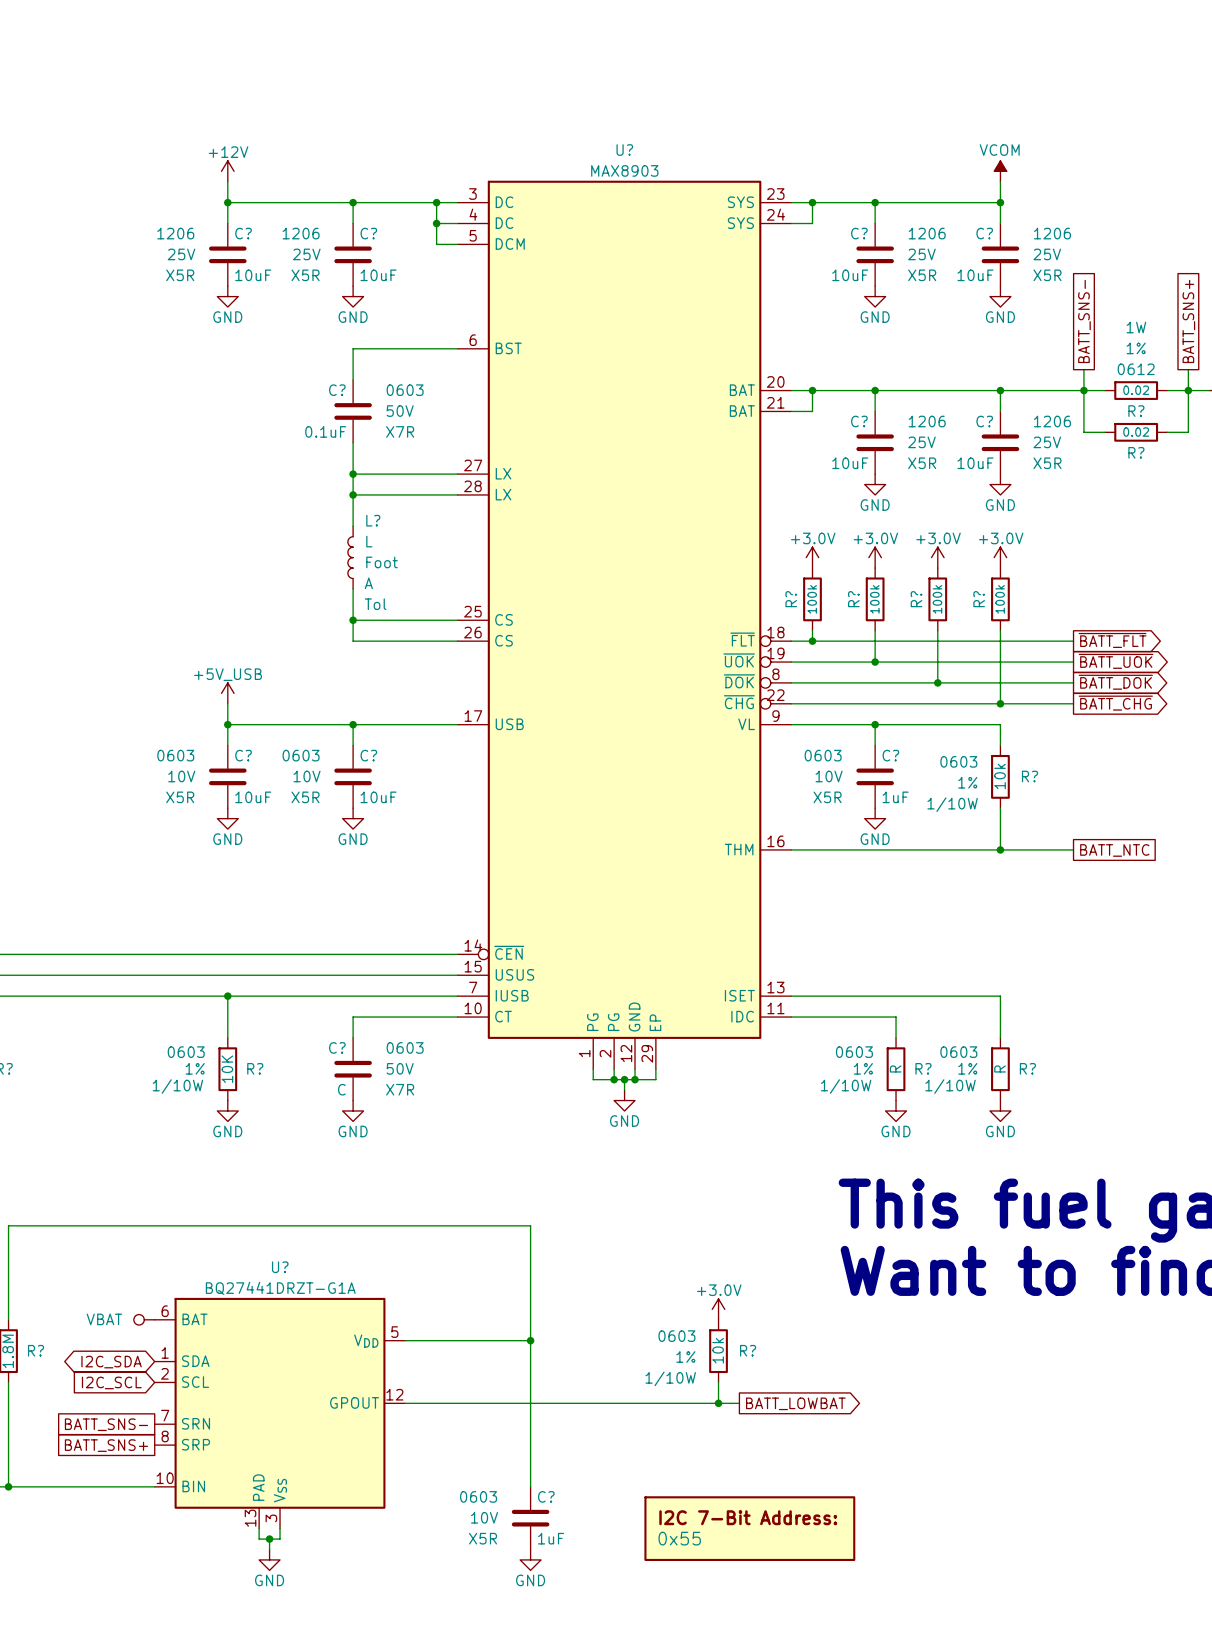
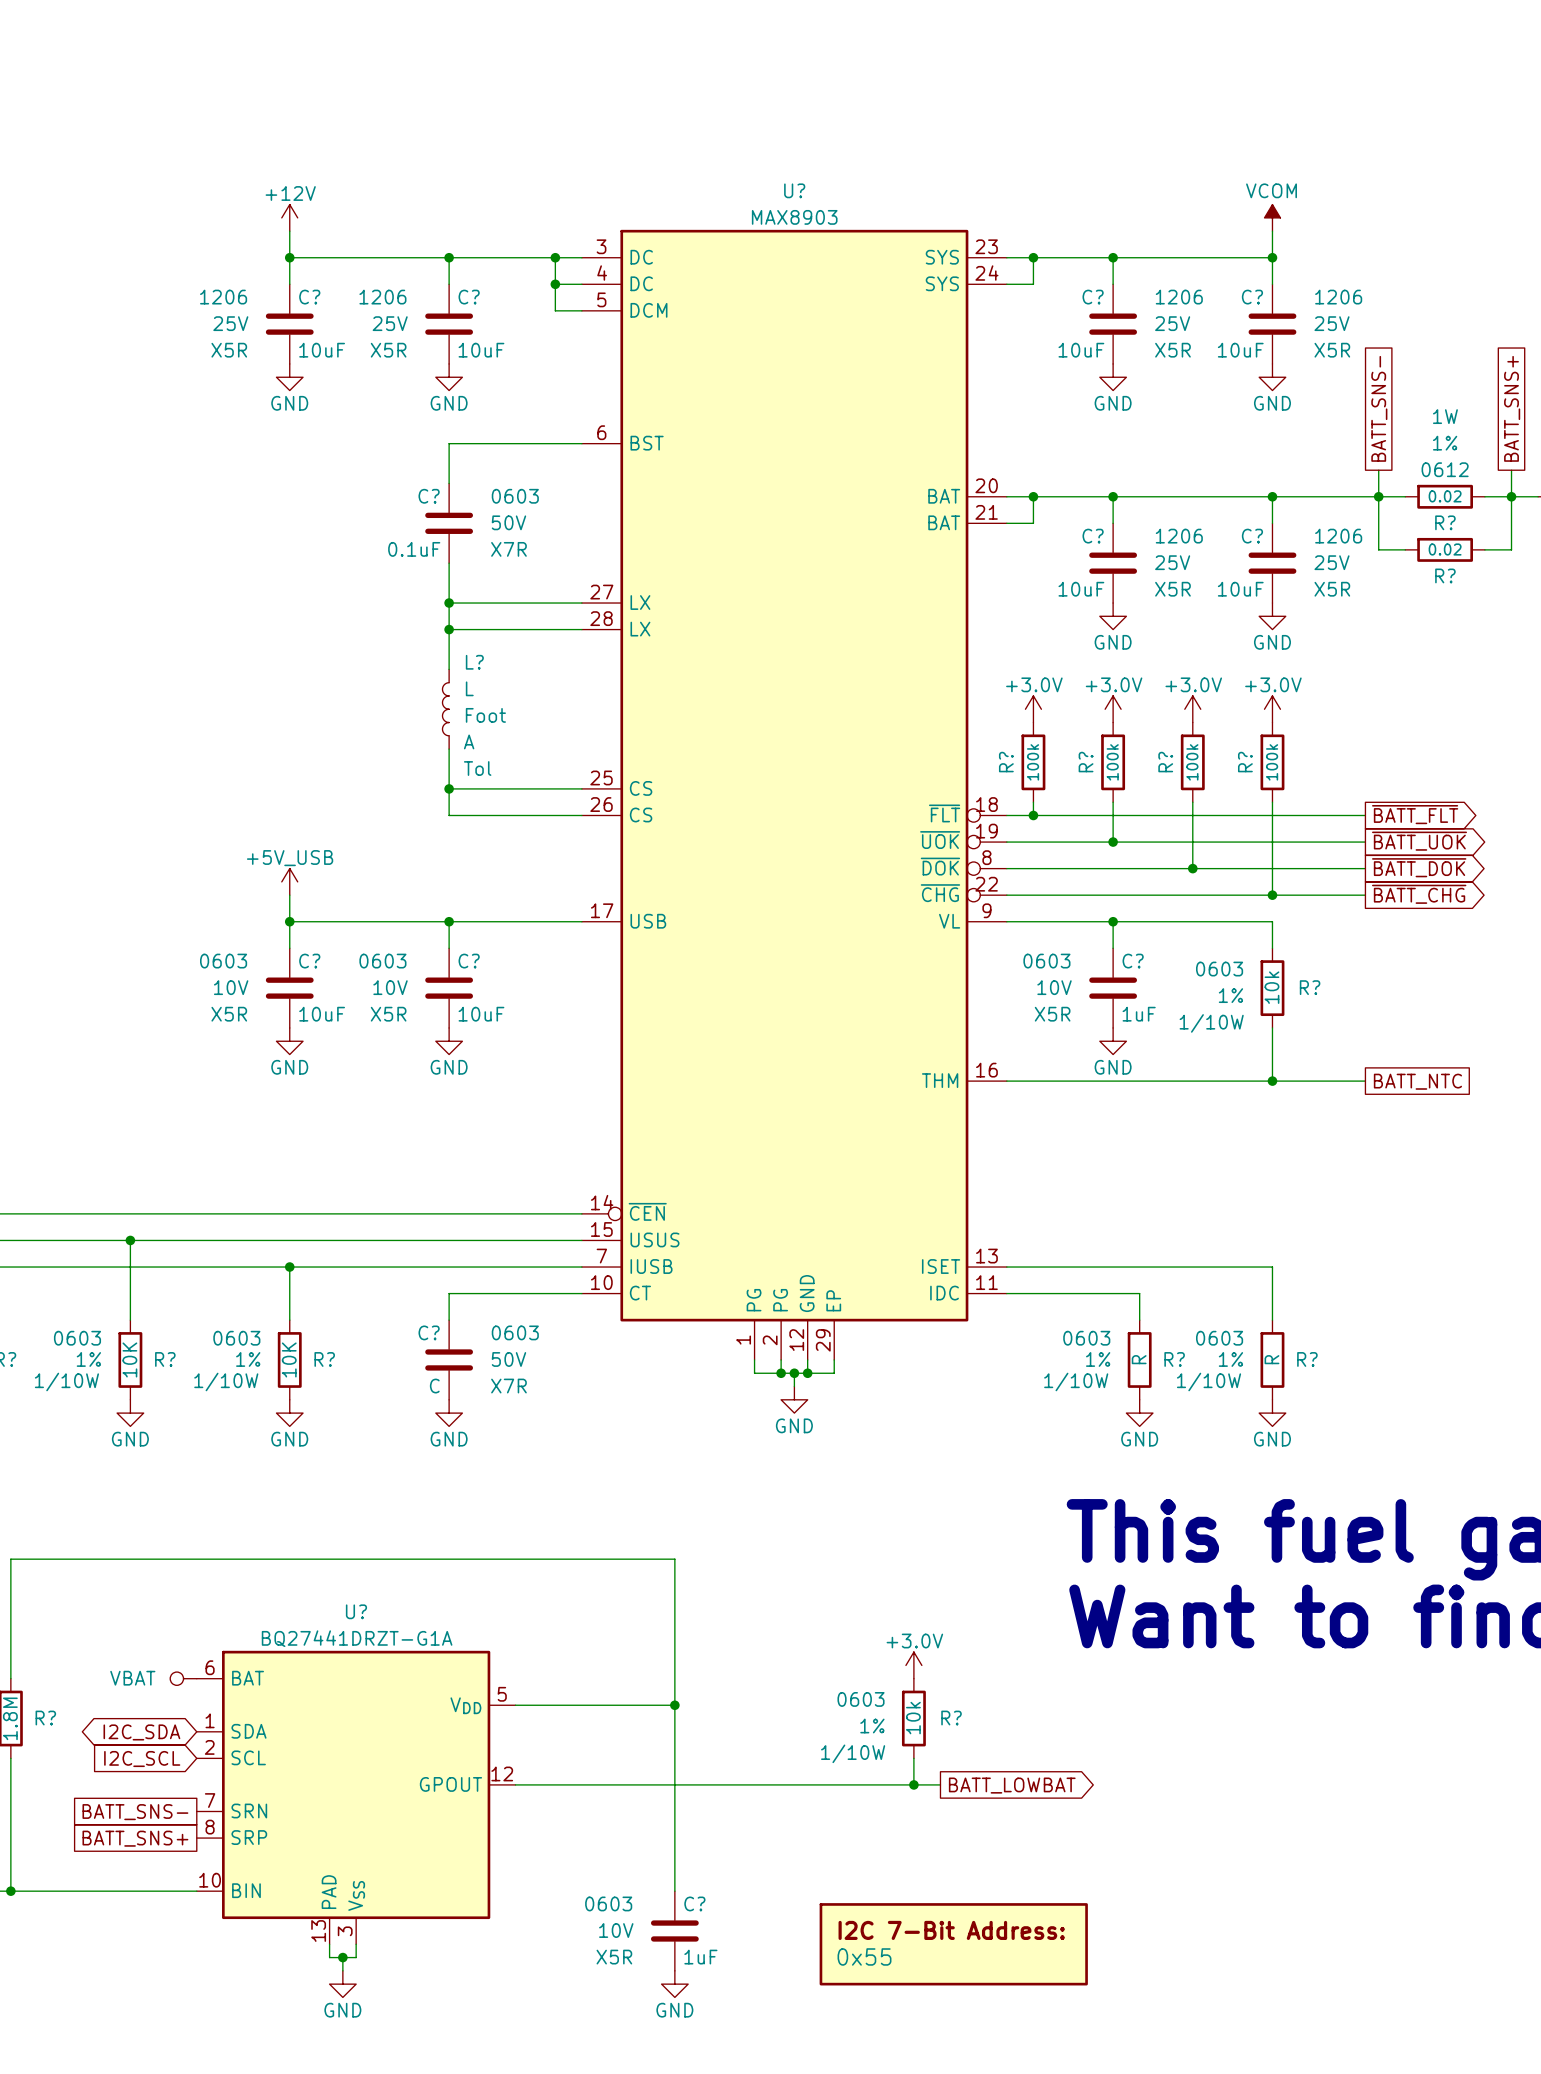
wire: none -> (130, 1240) (130, 1320)
junction: none -> (130, 1240)
R?: none -> 10K (130, 1359)
power symbol: none -> GND (130, 1413)

